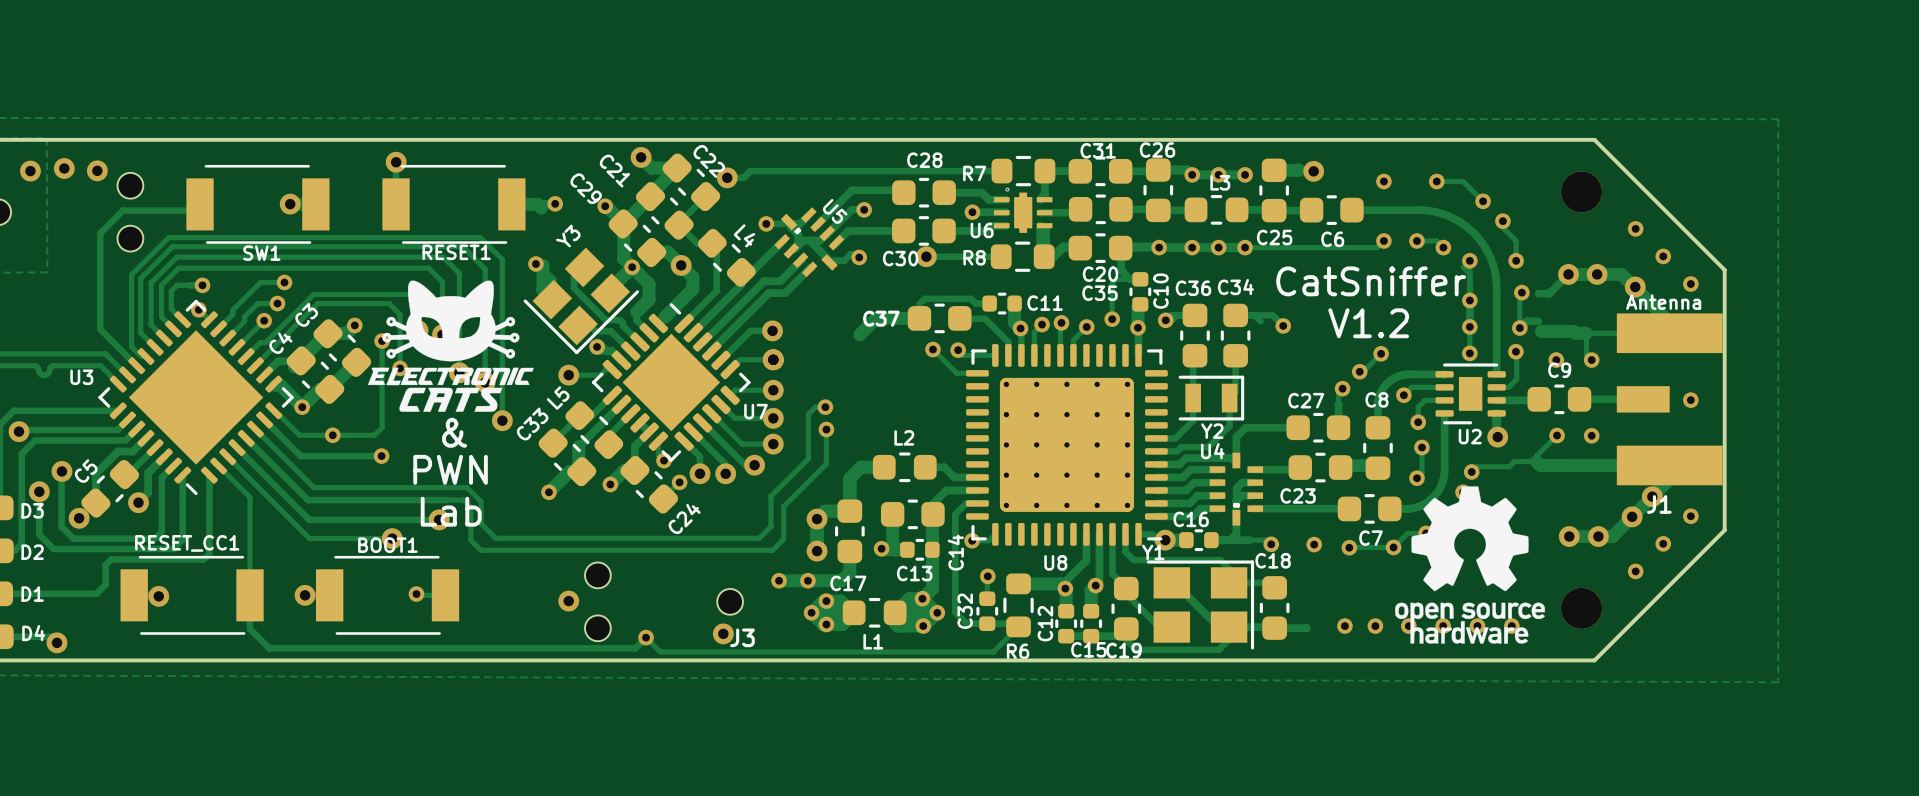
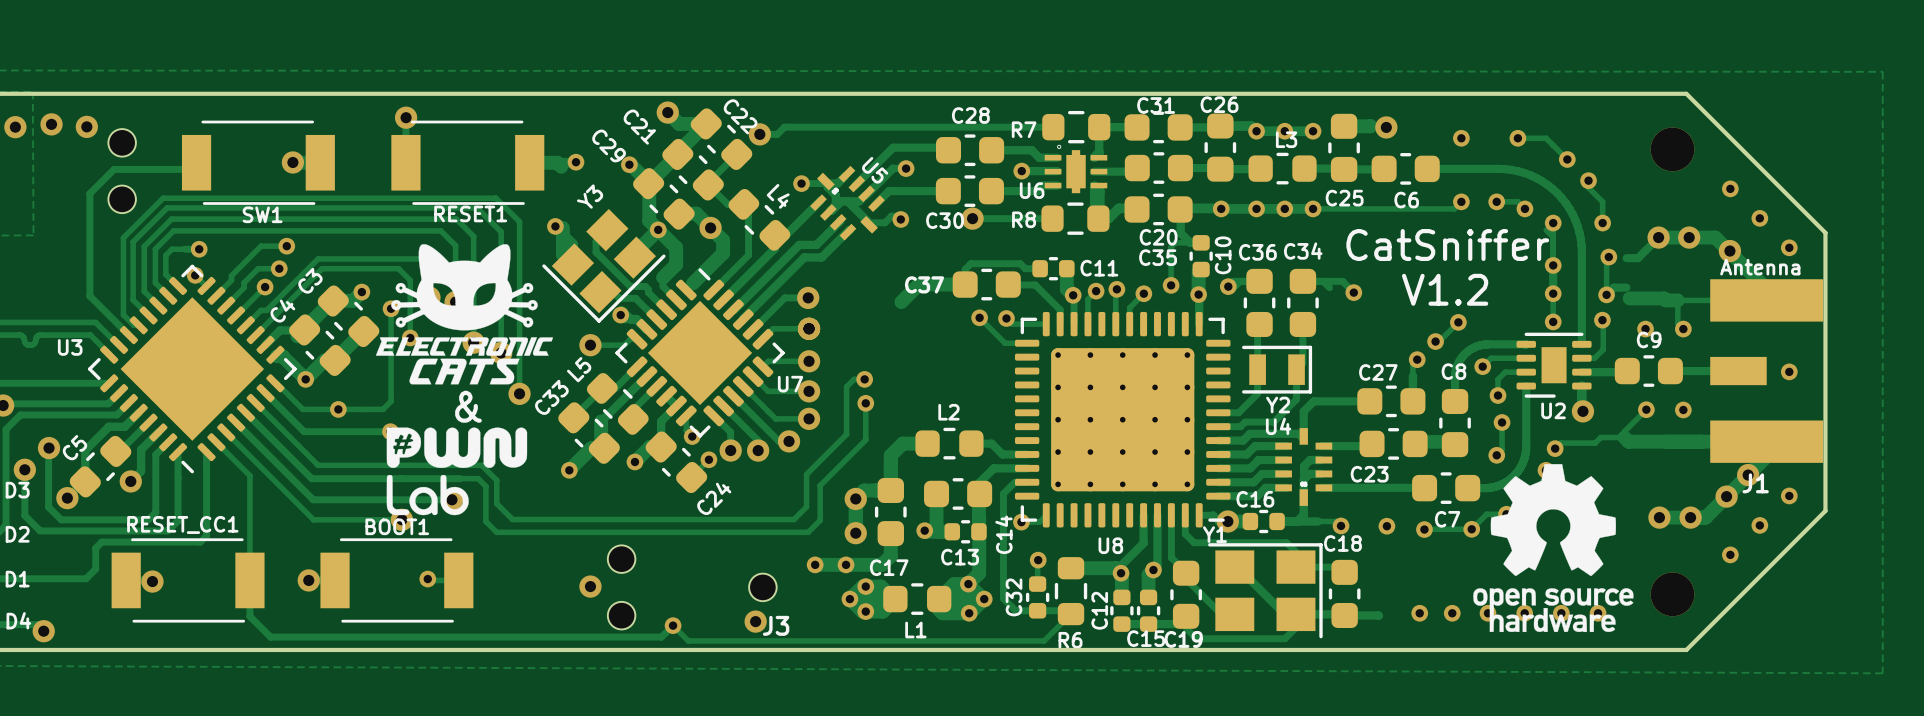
drawing: none -> [386, 427, 528, 516]
text: PWN (450, 469) -> none
text: Lab (451, 511) -> none

